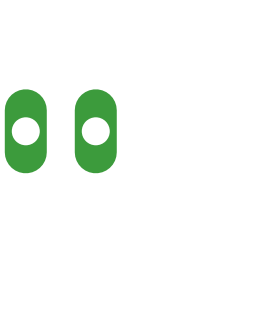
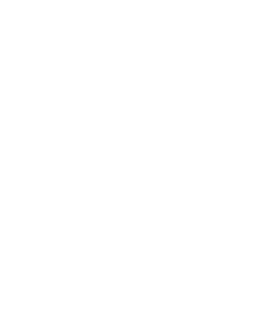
part: (60, 131) -> none

